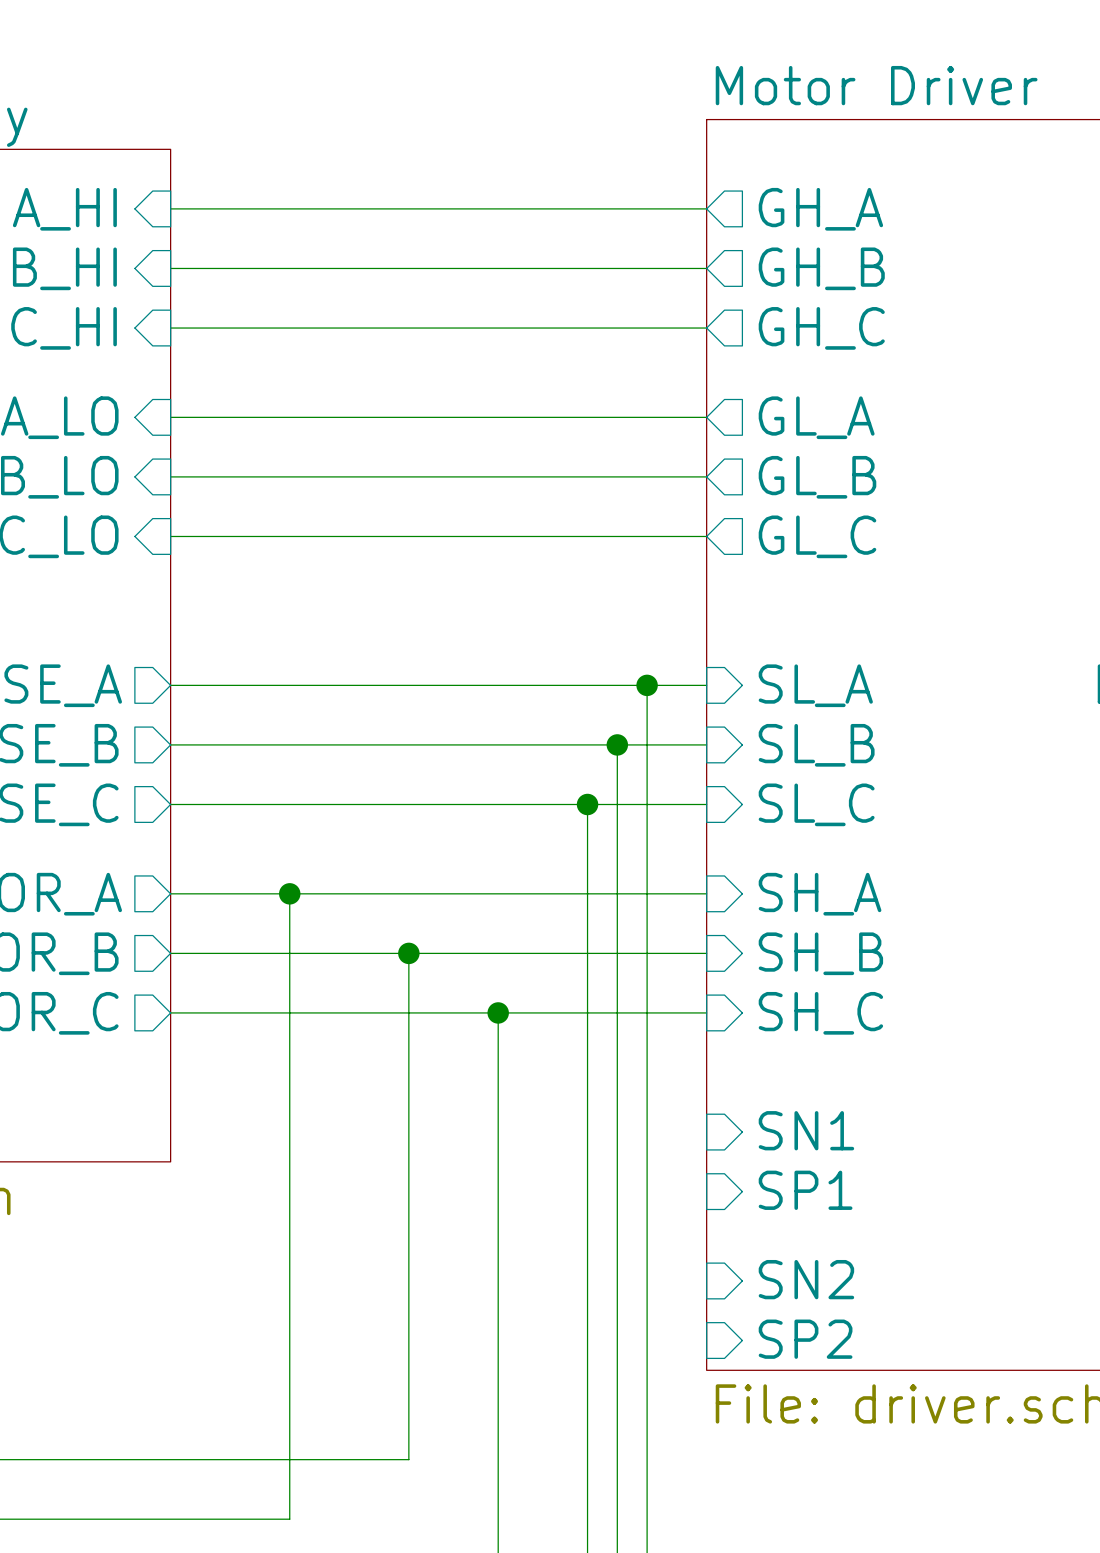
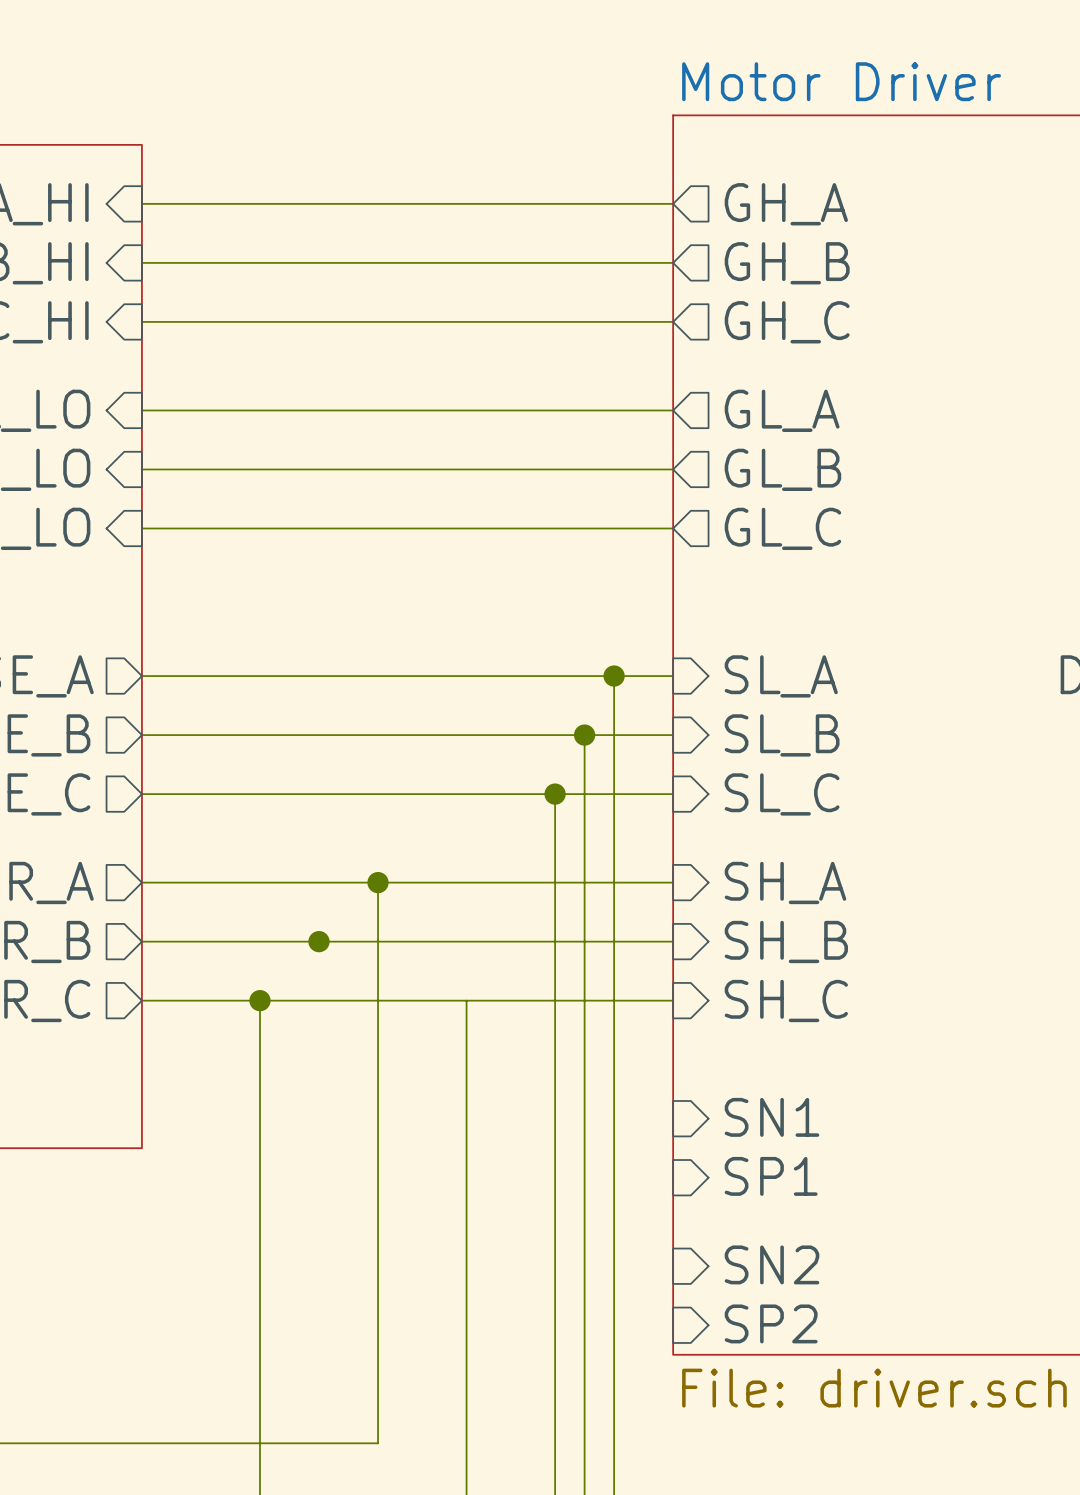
wire: (289, 893) (289, 1012) -> none
junction: (289, 893) -> none
wire: none -> (378, 882) (378, 941)
junction: none -> (378, 882)
junction: none -> (319, 941)
junction: (408, 953) -> none
junction: none -> (259, 1000)
junction: (498, 1012) -> none

